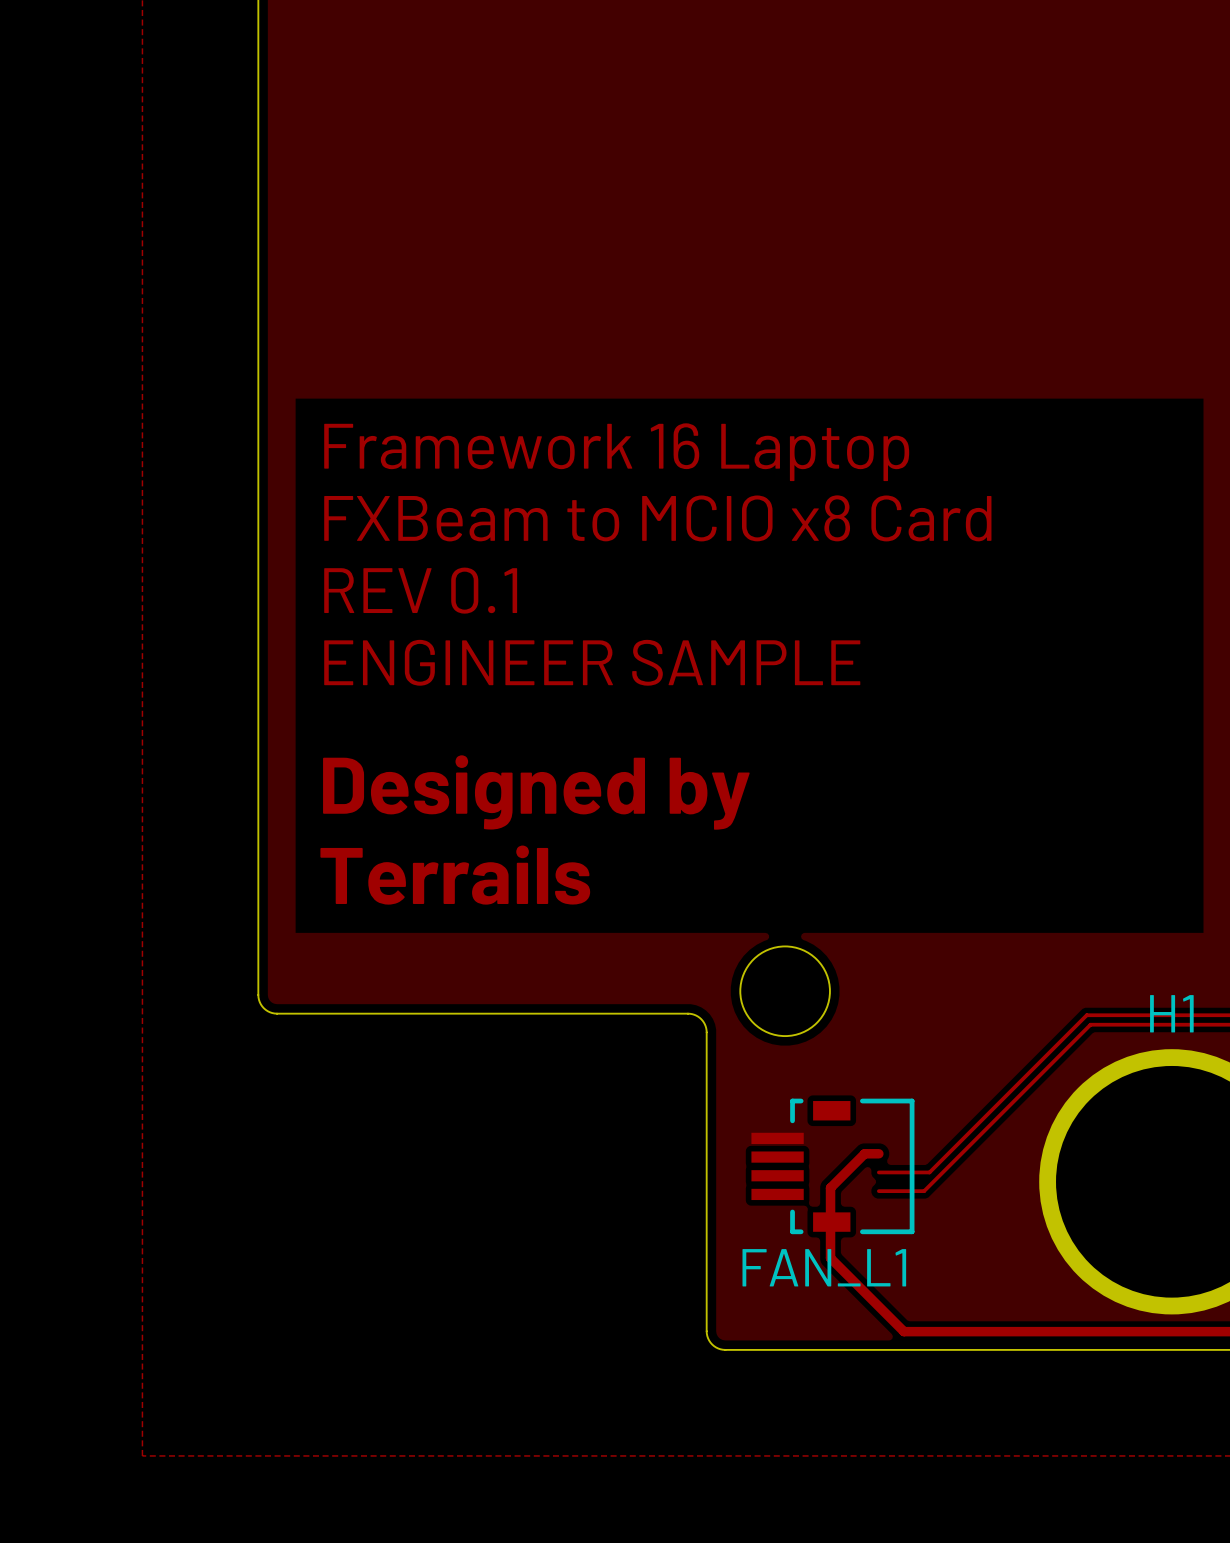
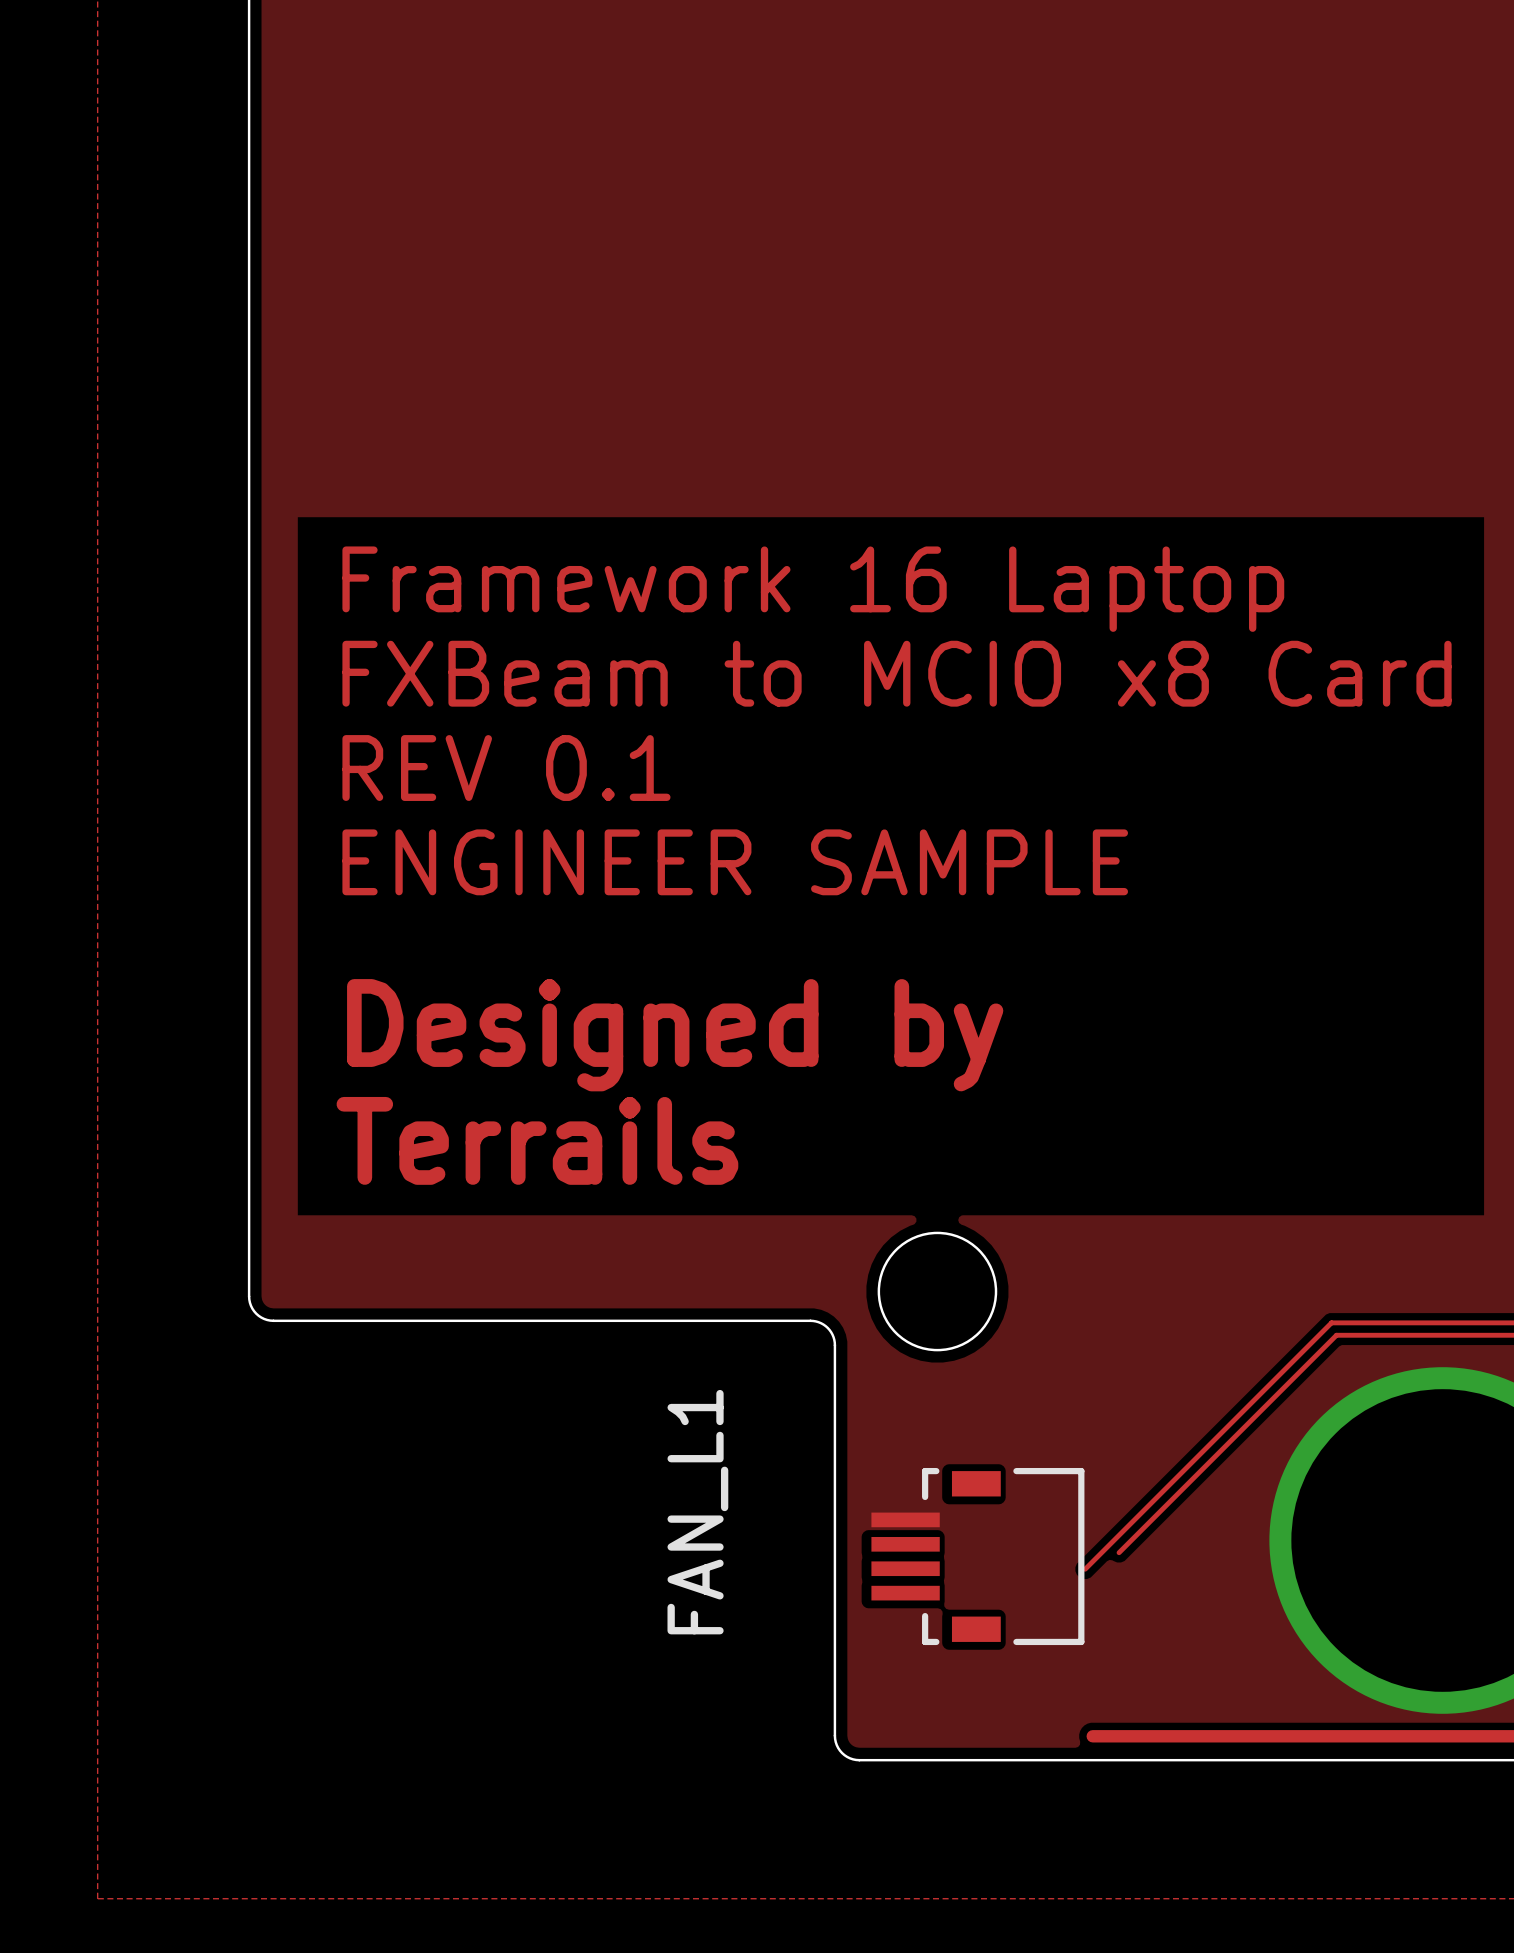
H1 name: H1 (1171, 1013) -> none
track: (878, 1153) (864, 1153) (830, 1187) (830, 1258) (904, 1331) -> none
FAN_L1 position: (832, 1166) -> (977, 1556)
track: (878, 1172) (929, 1172) -> (1085, 1569) (1126, 1528)
track: (878, 1191) (924, 1191) -> none
FAN_L1 name rotation: 0° (824, 1267) -> 90° counterclockwise (697, 1512)
FAN_L1 name position: FAN_L1 (824, 1267) -> FAN_L1 (697, 1512)

